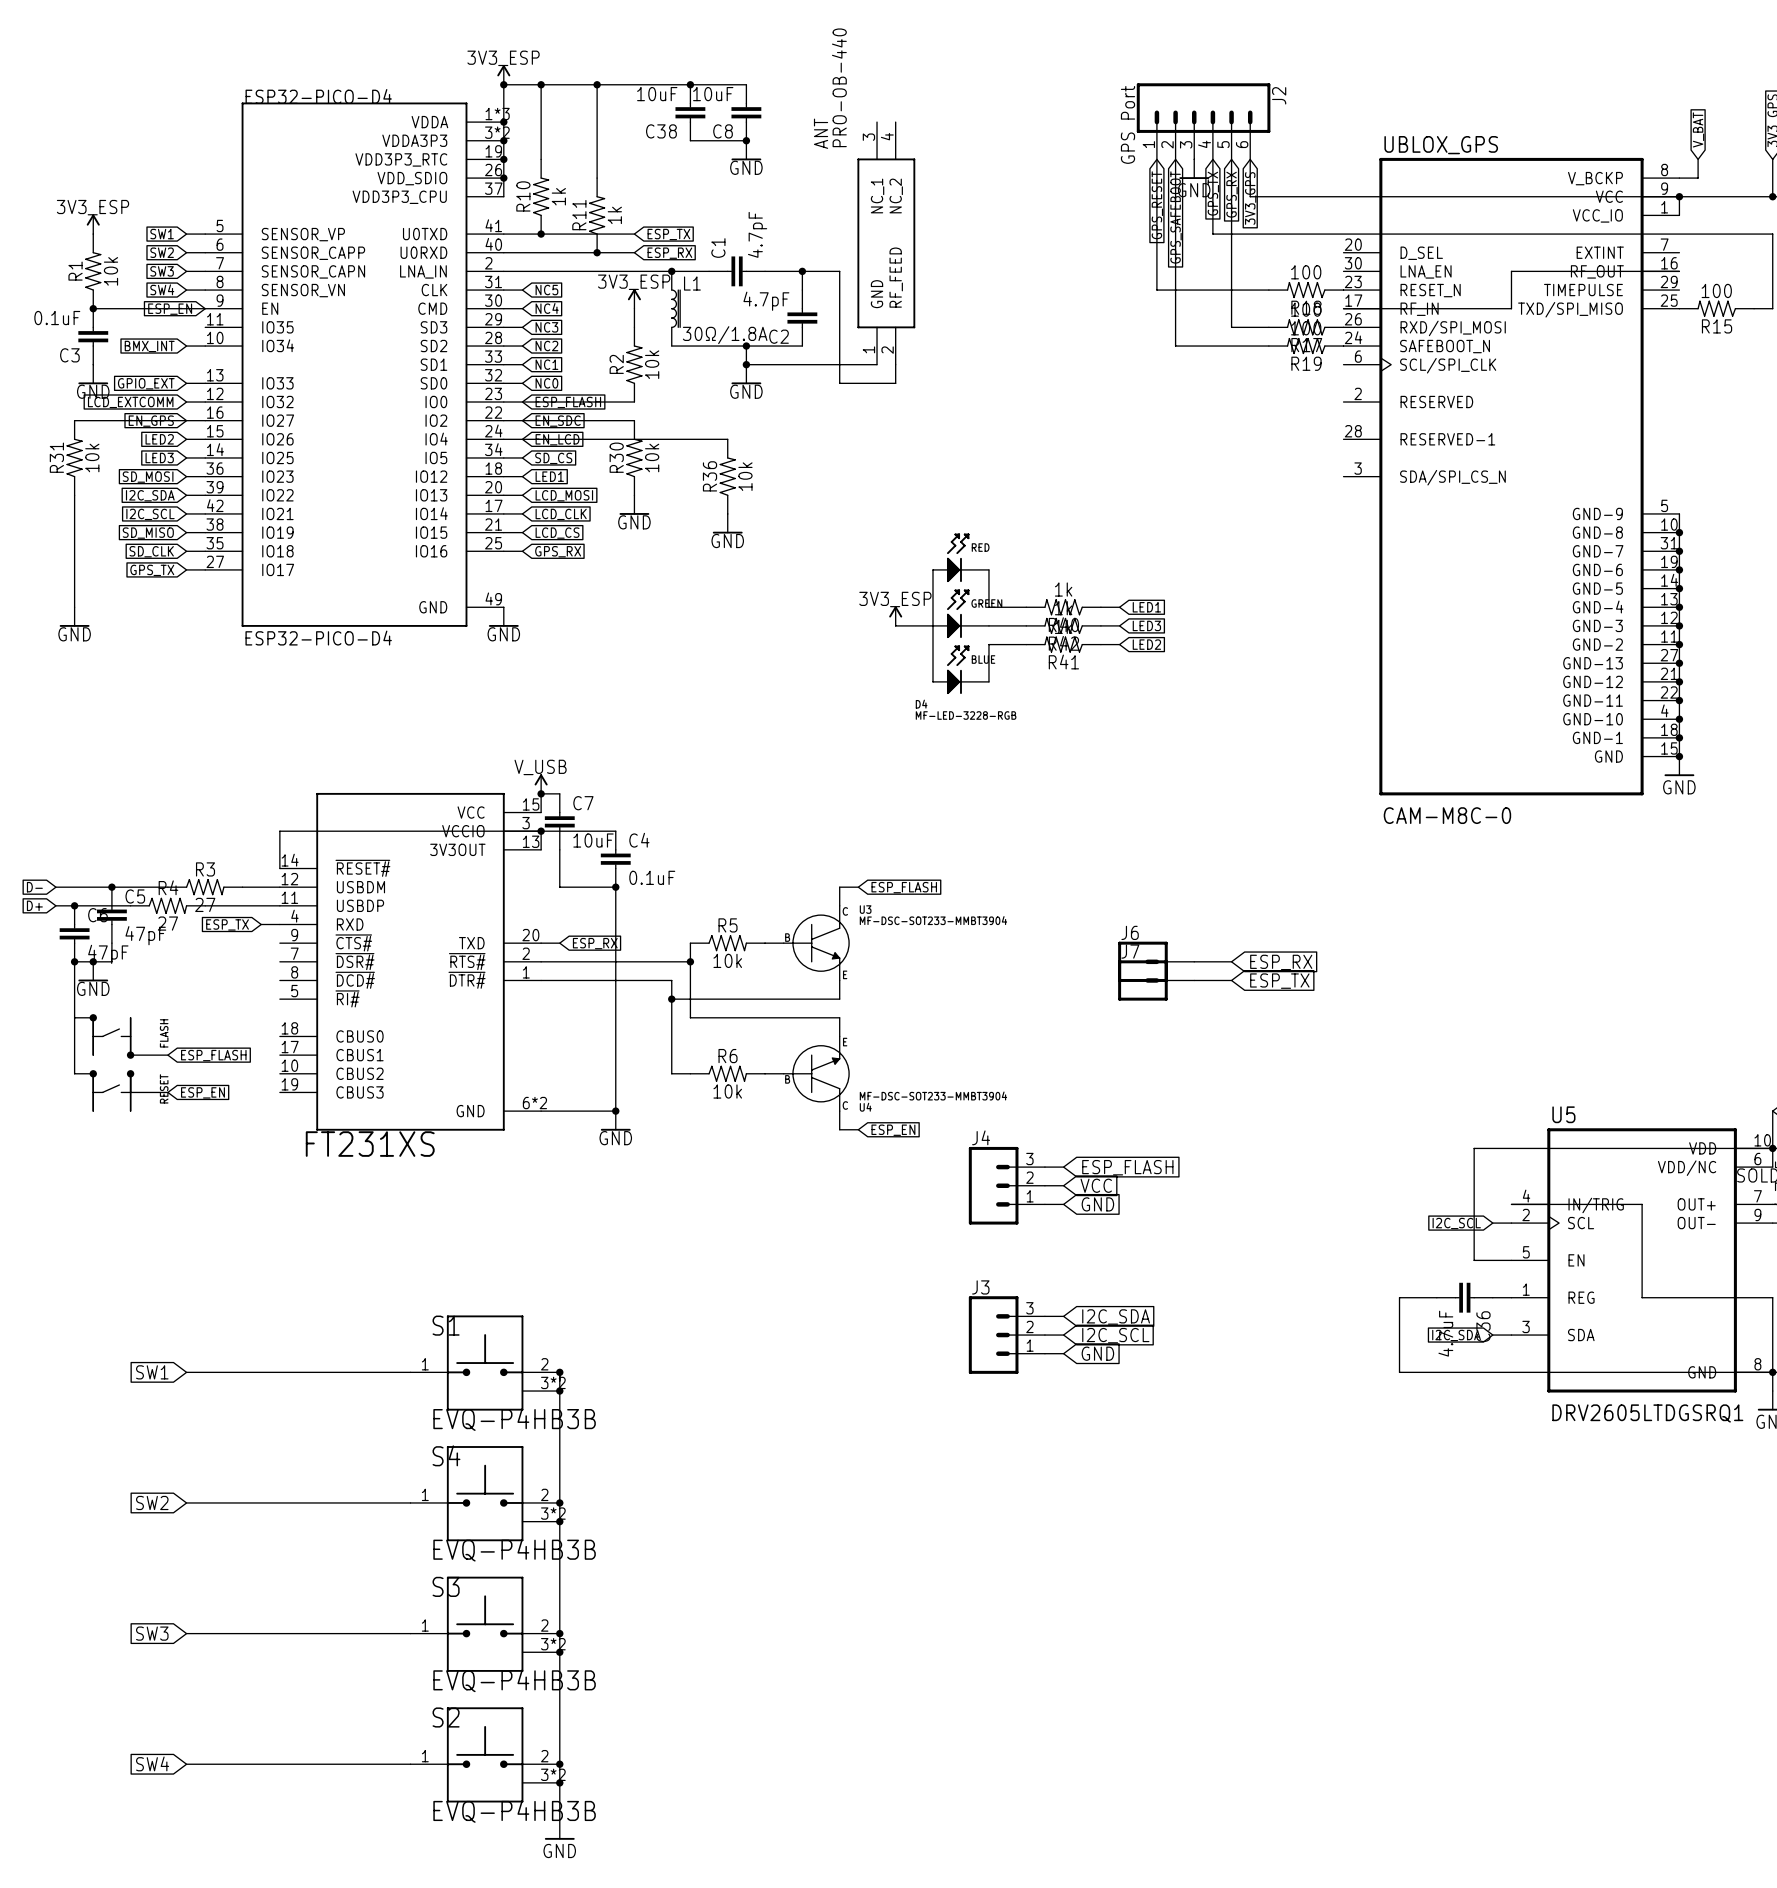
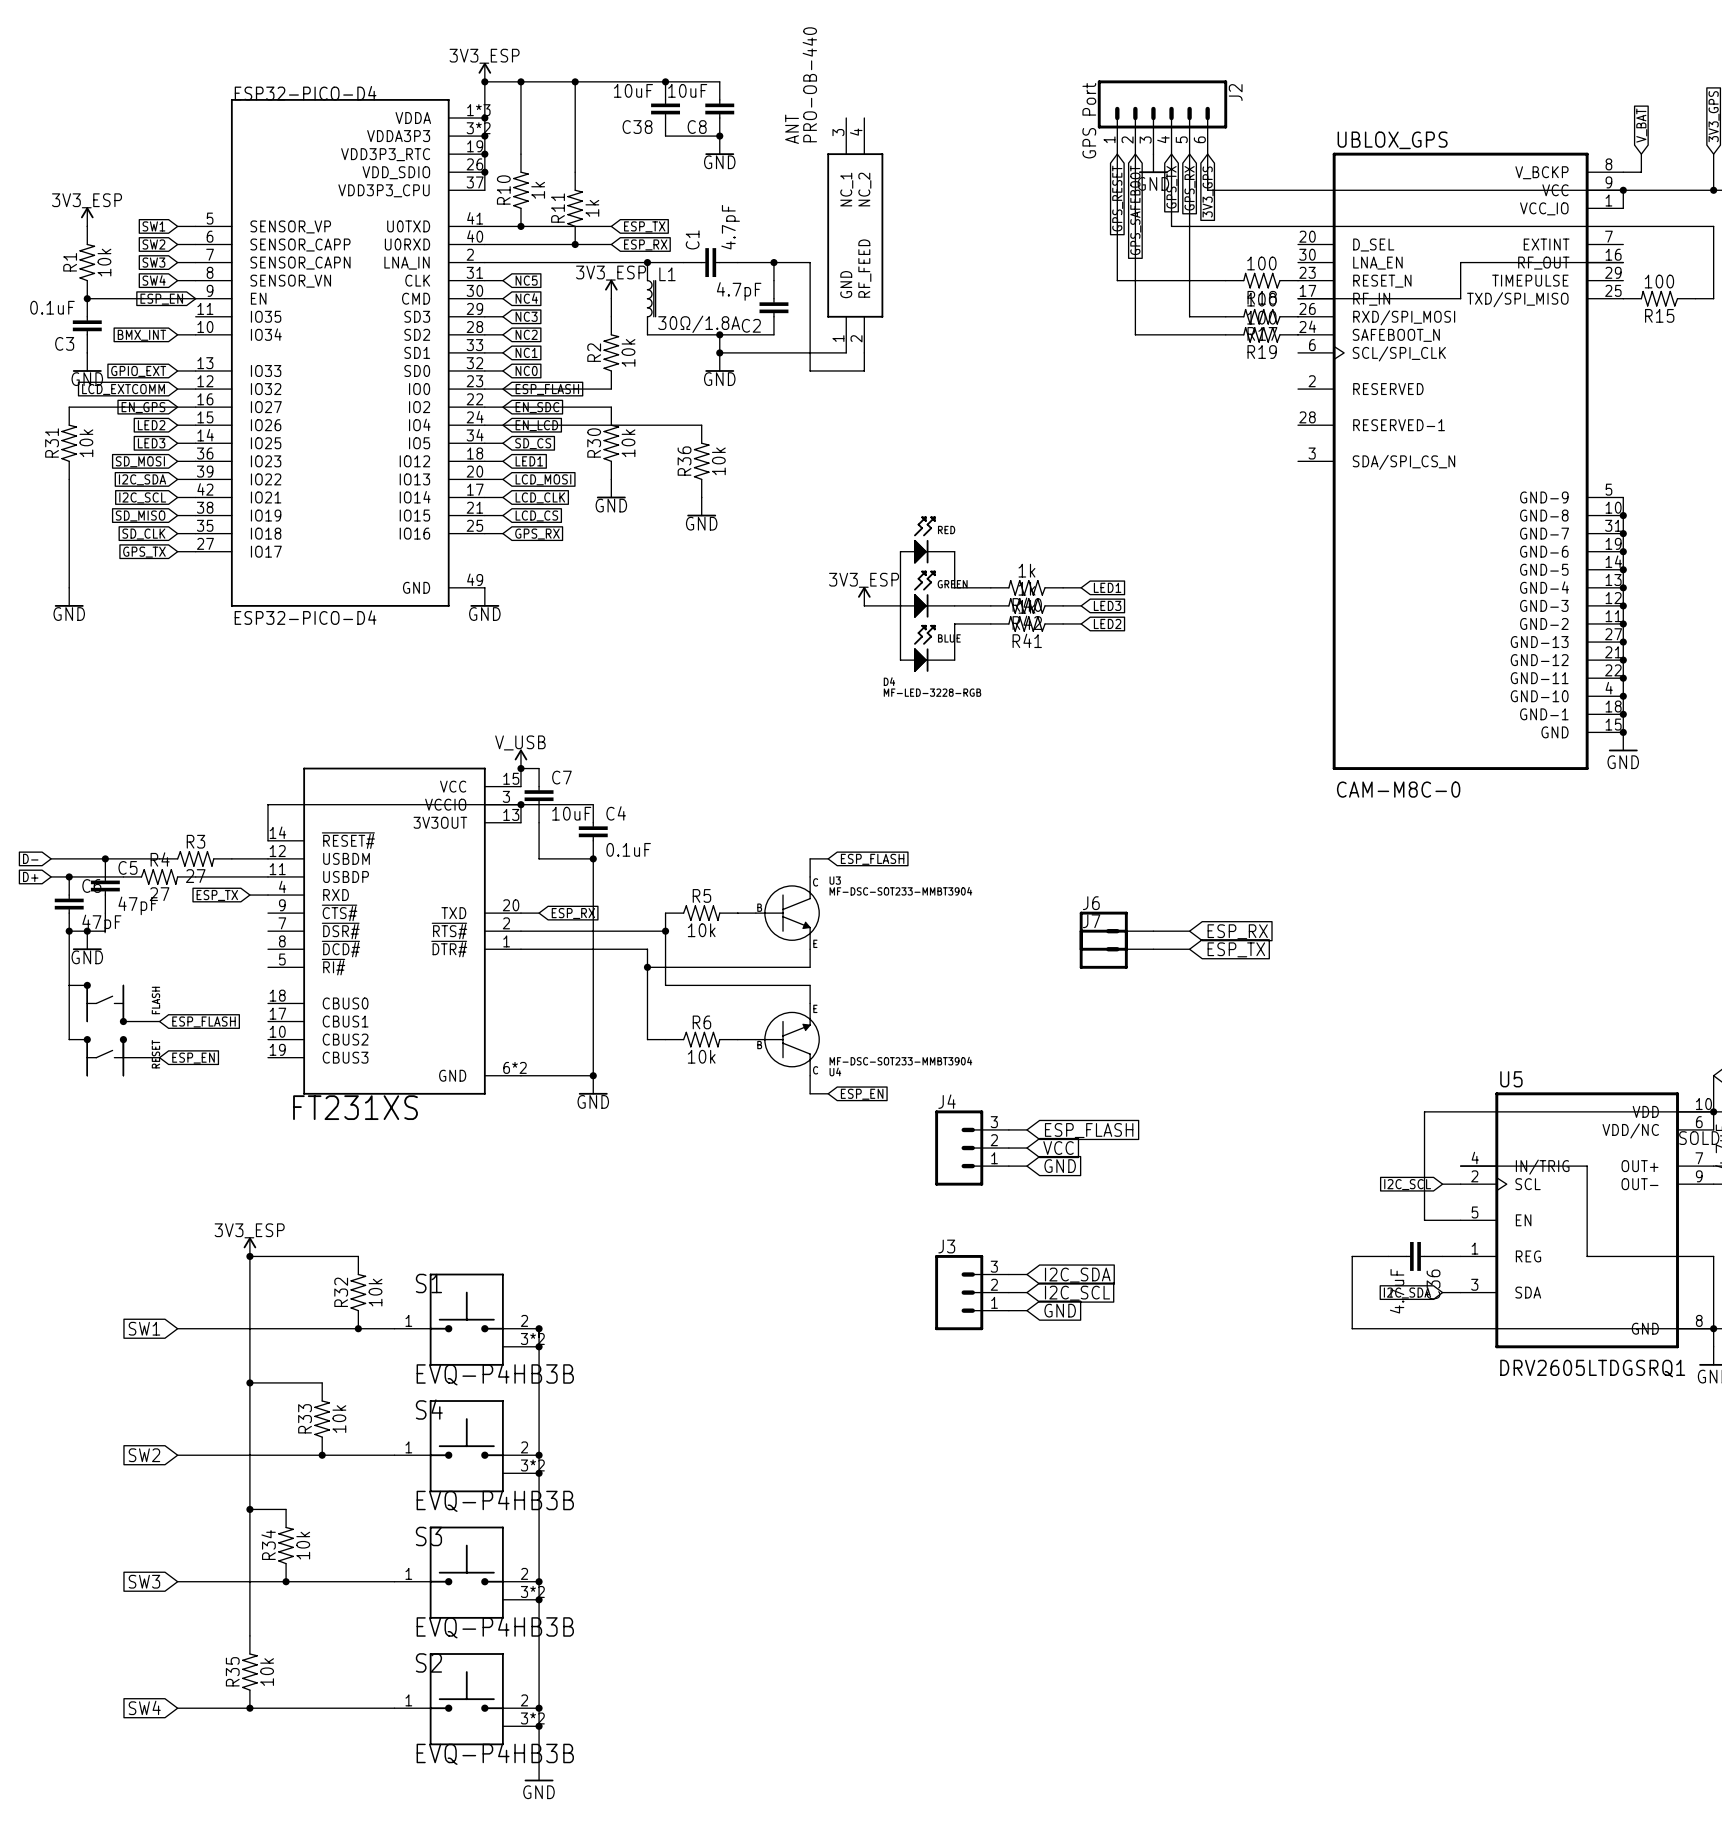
power symbol: none -> 3V3_ESP (249, 1246)
junction: none -> (249, 1256)
wire: none -> (358, 1256) (249, 1256) (249, 1635)
R32: none -> 10k (358, 1292)
junction: none -> (358, 1328)
wire: none -> (249, 1382) (322, 1382)
junction: none -> (249, 1382)
R33: none -> 10k (322, 1419)
junction: none -> (322, 1455)
wire: none -> (249, 1509) (286, 1509)
junction: none -> (249, 1509)
R34: none -> 10k (286, 1545)
junction: none -> (286, 1581)
R35: none -> 10k (249, 1672)
junction: none -> (249, 1708)

